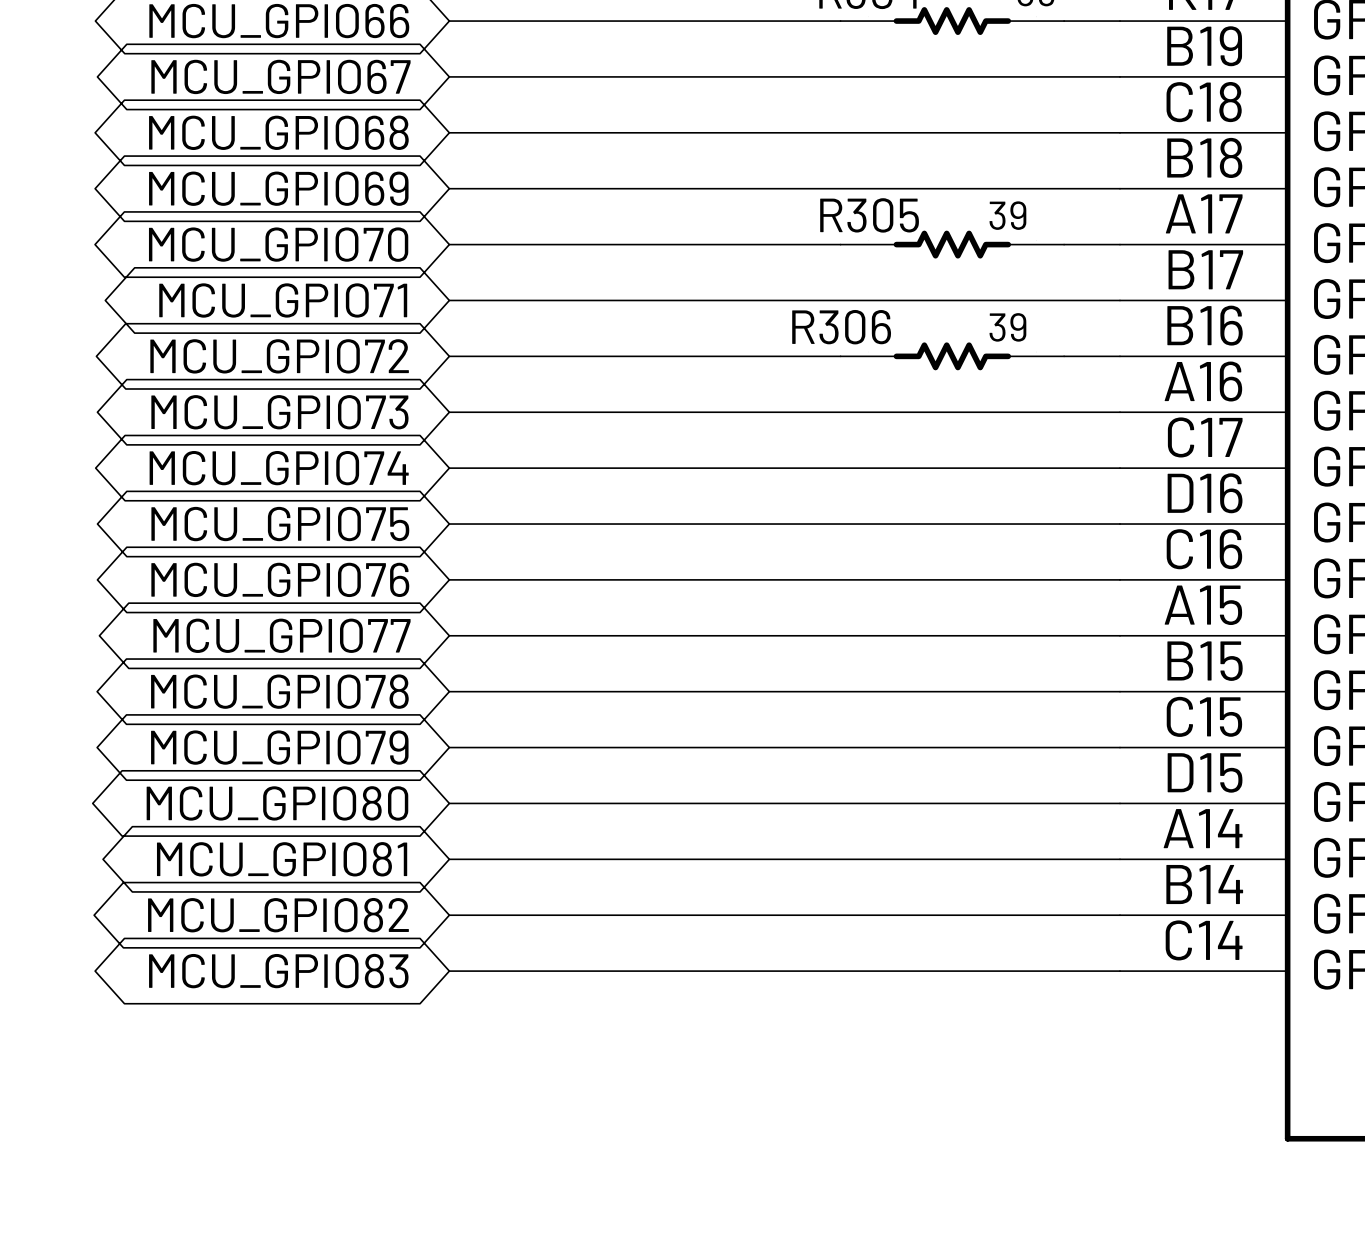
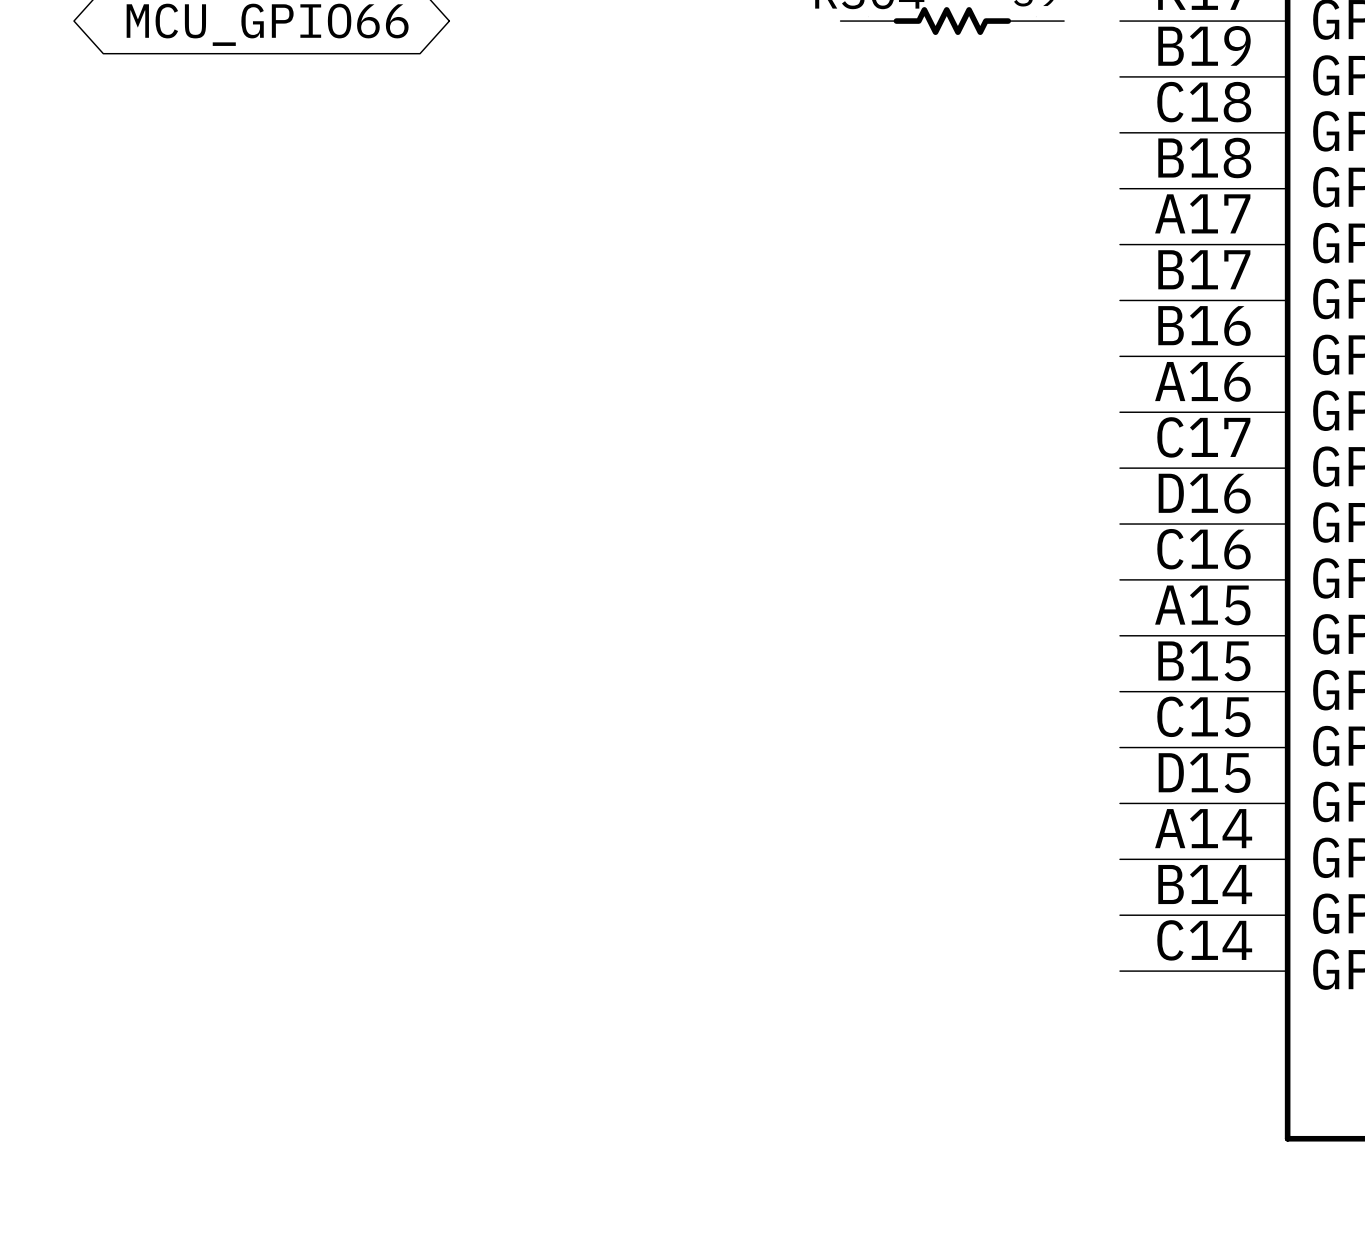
wire: (449, 21) (840, 21) -> none
wire: (1064, 21) (1119, 21) -> none
global label: MCU_GPIO67 (280, 76) -> none
wire: (449, 76) (1119, 76) -> none
global label: MCU_GPIO68 (278, 132) -> none
wire: (449, 132) (1119, 132) -> none
global label: MCU_GPIO69 (278, 188) -> none
wire: (449, 188) (1119, 188) -> none
global label: MCU_GPIO70 (278, 244) -> none
wire: (449, 244) (840, 244) -> none
R305: 39 (952, 244) -> none
wire: (1064, 244) (1119, 244) -> none
global label: MCU_GPIO71 (283, 300) -> none
wire: (449, 300) (1119, 300) -> none
global label: MCU_GPIO72 (279, 356) -> none
wire: (449, 356) (840, 356) -> none
R306: 39 (952, 356) -> none
wire: (1064, 356) (1119, 356) -> none
global label: MCU_GPIO73 (279, 412) -> none
wire: (449, 412) (1119, 412) -> none
global label: MCU_GPIO74 (279, 468) -> none
wire: (449, 468) (1119, 468) -> none
global label: MCU_GPIO75 (280, 524) -> none
wire: (449, 524) (1119, 524) -> none
global label: MCU_GPIO76 (280, 579) -> none
wire: (449, 579) (1119, 579) -> none
global label: MCU_GPIO77 (281, 635) -> none
wire: (449, 635) (1119, 635) -> none
global label: MCU_GPIO78 (279, 691) -> none
wire: (449, 691) (1119, 691) -> none
global label: MCU_GPIO79 (279, 747) -> none
wire: (449, 747) (1119, 747) -> none
global label: MCU_GPIO80 (277, 803) -> none
wire: (449, 803) (1119, 803) -> none
global label: MCU_GPIO81 (282, 859) -> none
wire: (449, 859) (1119, 859) -> none
global label: MCU_GPIO82 (278, 915) -> none
wire: (449, 915) (1119, 915) -> none
global label: MCU_GPIO83 (278, 971) -> none
wire: (449, 971) (1119, 971) -> none

